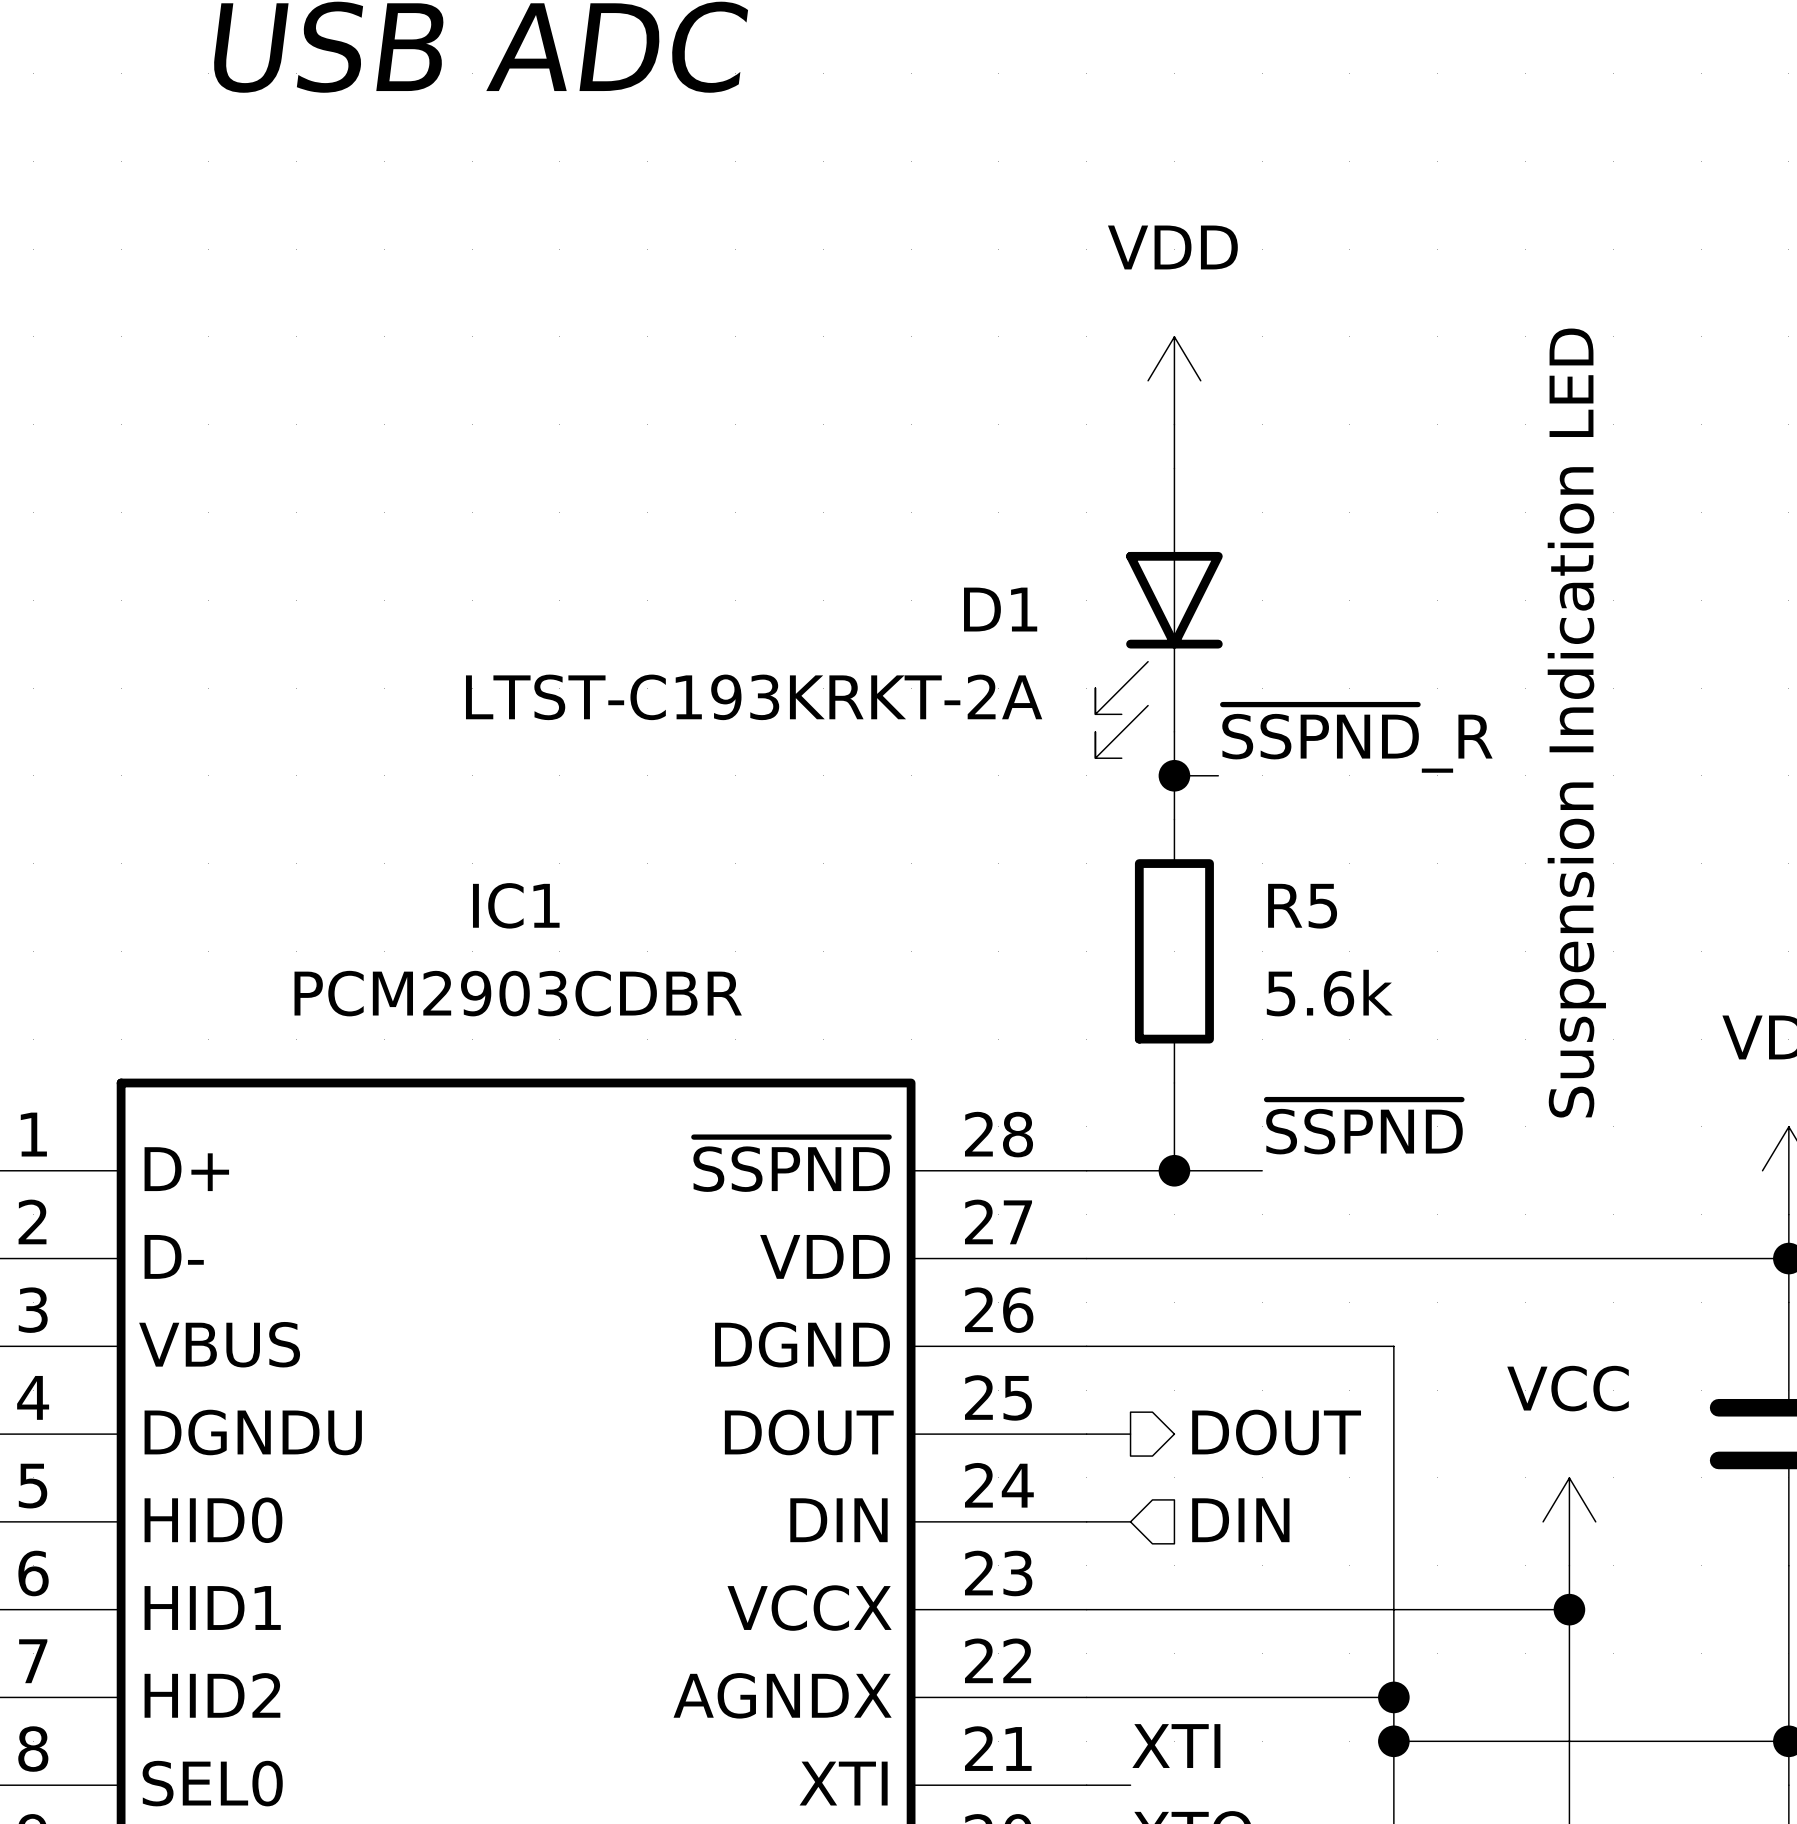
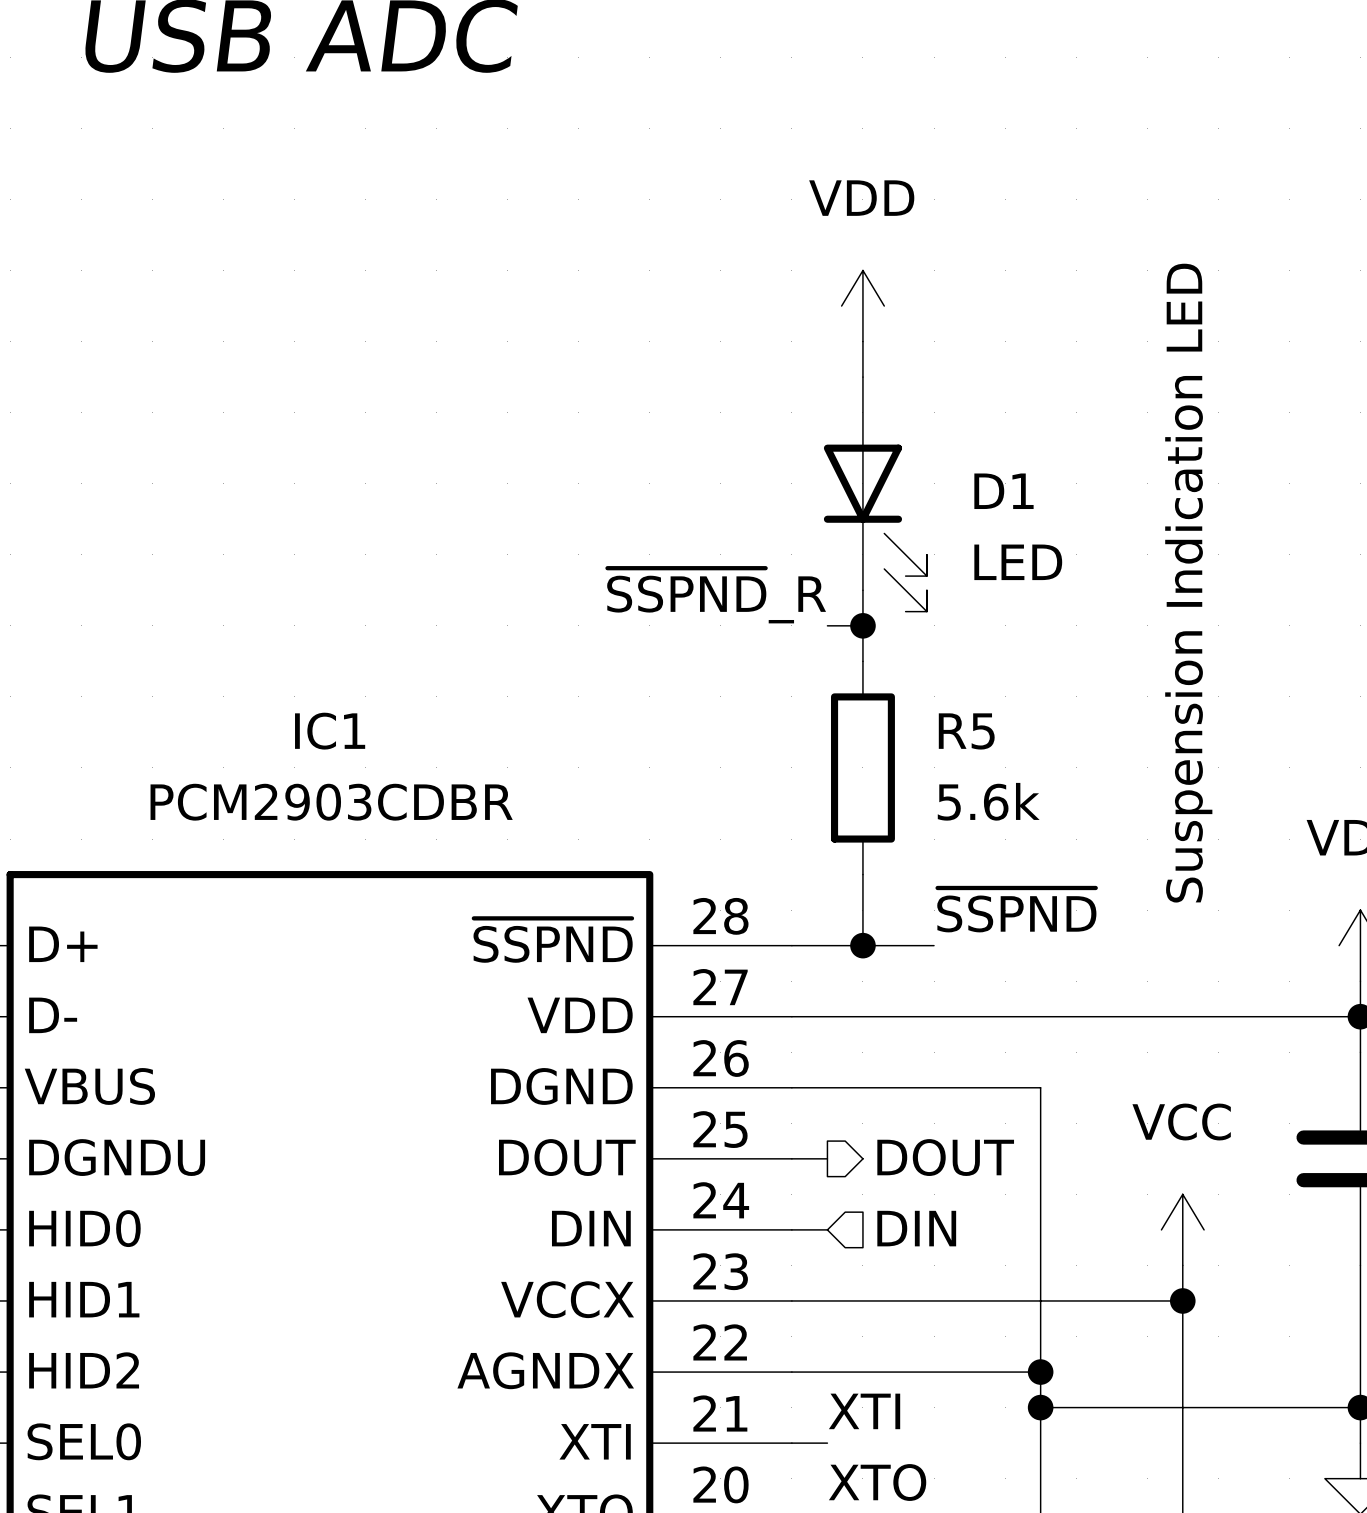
D1 flip: as is (1159, 655) -> left-right (875, 528)
D1 value: LTST-C193KRKT-2A (754, 697) -> LED (1018, 562)
label position: ~{SSPND}_R (1357, 738) -> ~{SSPND}_R (716, 595)
wire: (1174, 775) (1218, 775) -> (862, 625) (827, 625)

